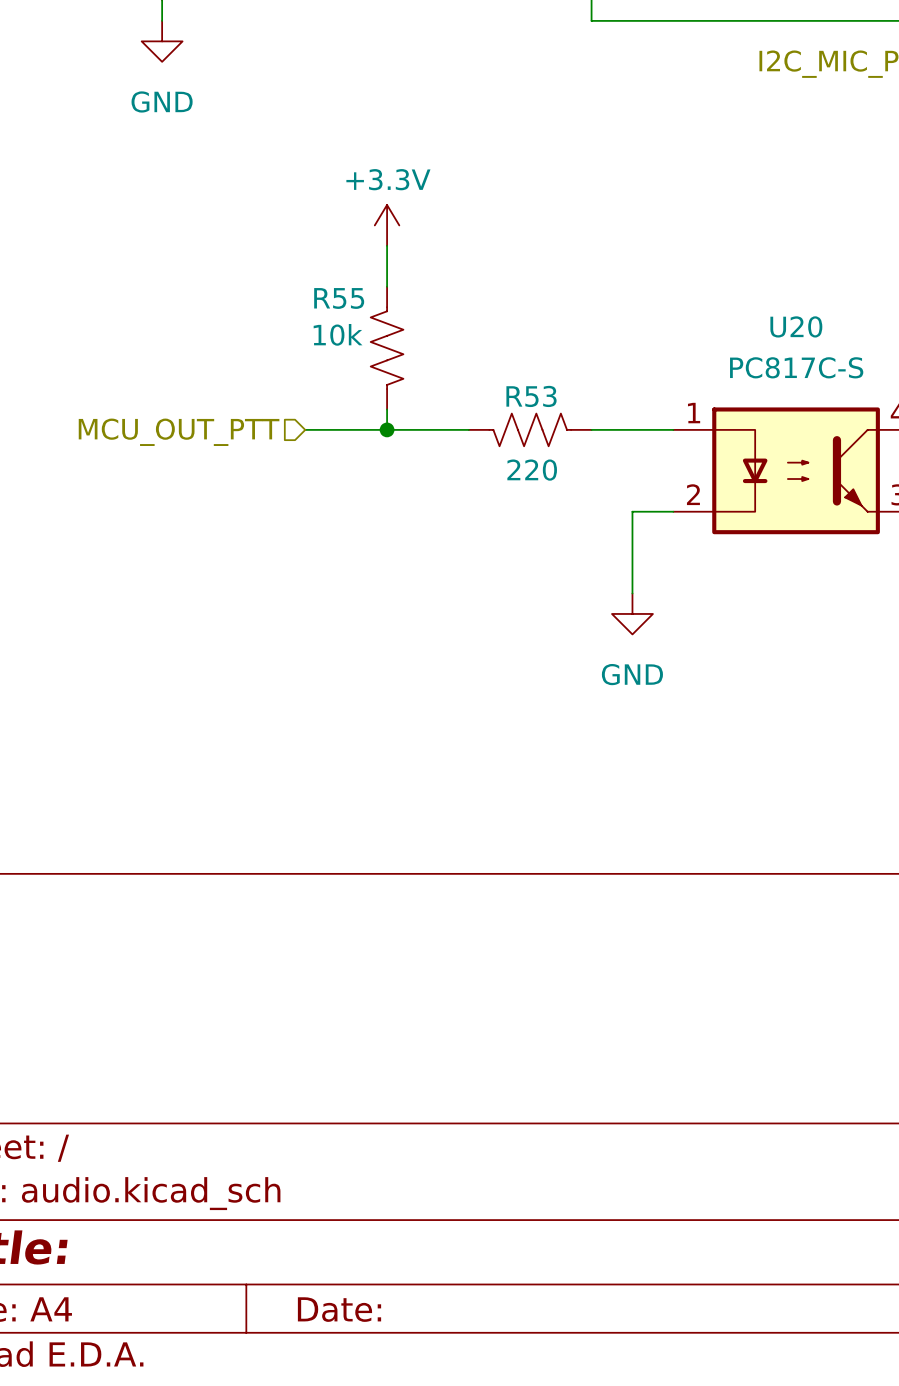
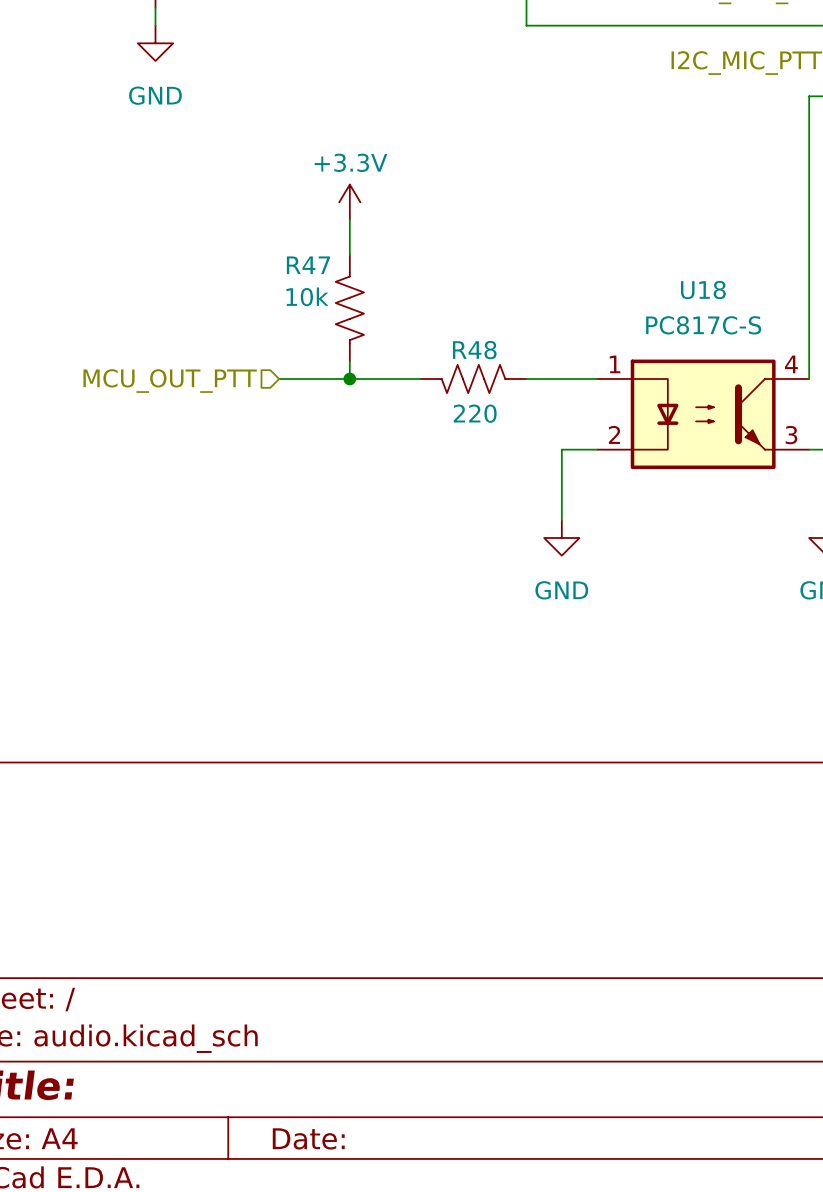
R55 name: R55 (339, 298) -> R47 (308, 265)
U20 name: U20 (796, 326) -> U18 (703, 290)
R53 name: R53 (531, 396) -> R48 (474, 350)

